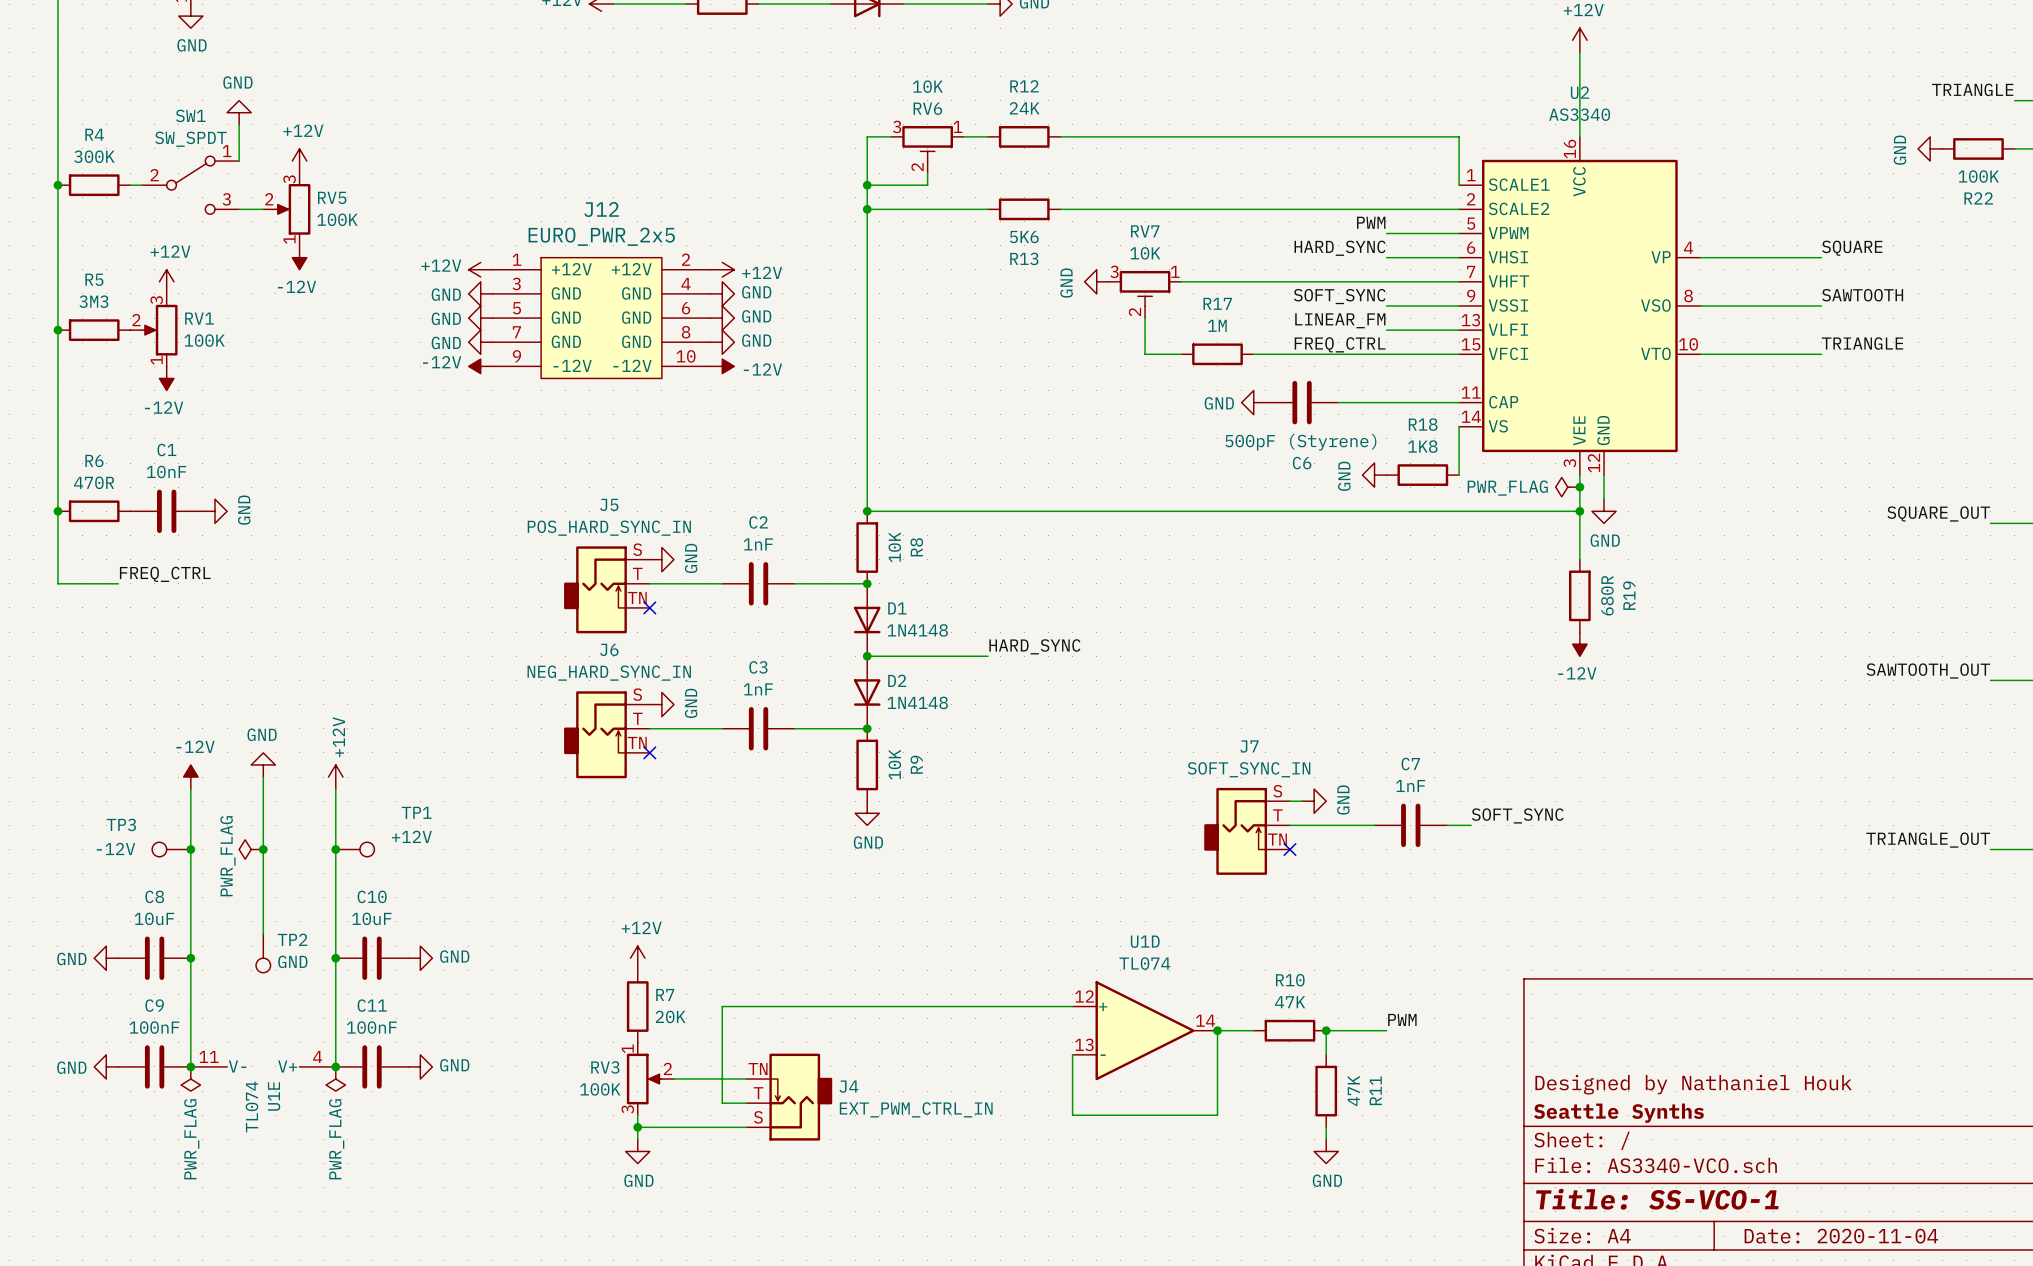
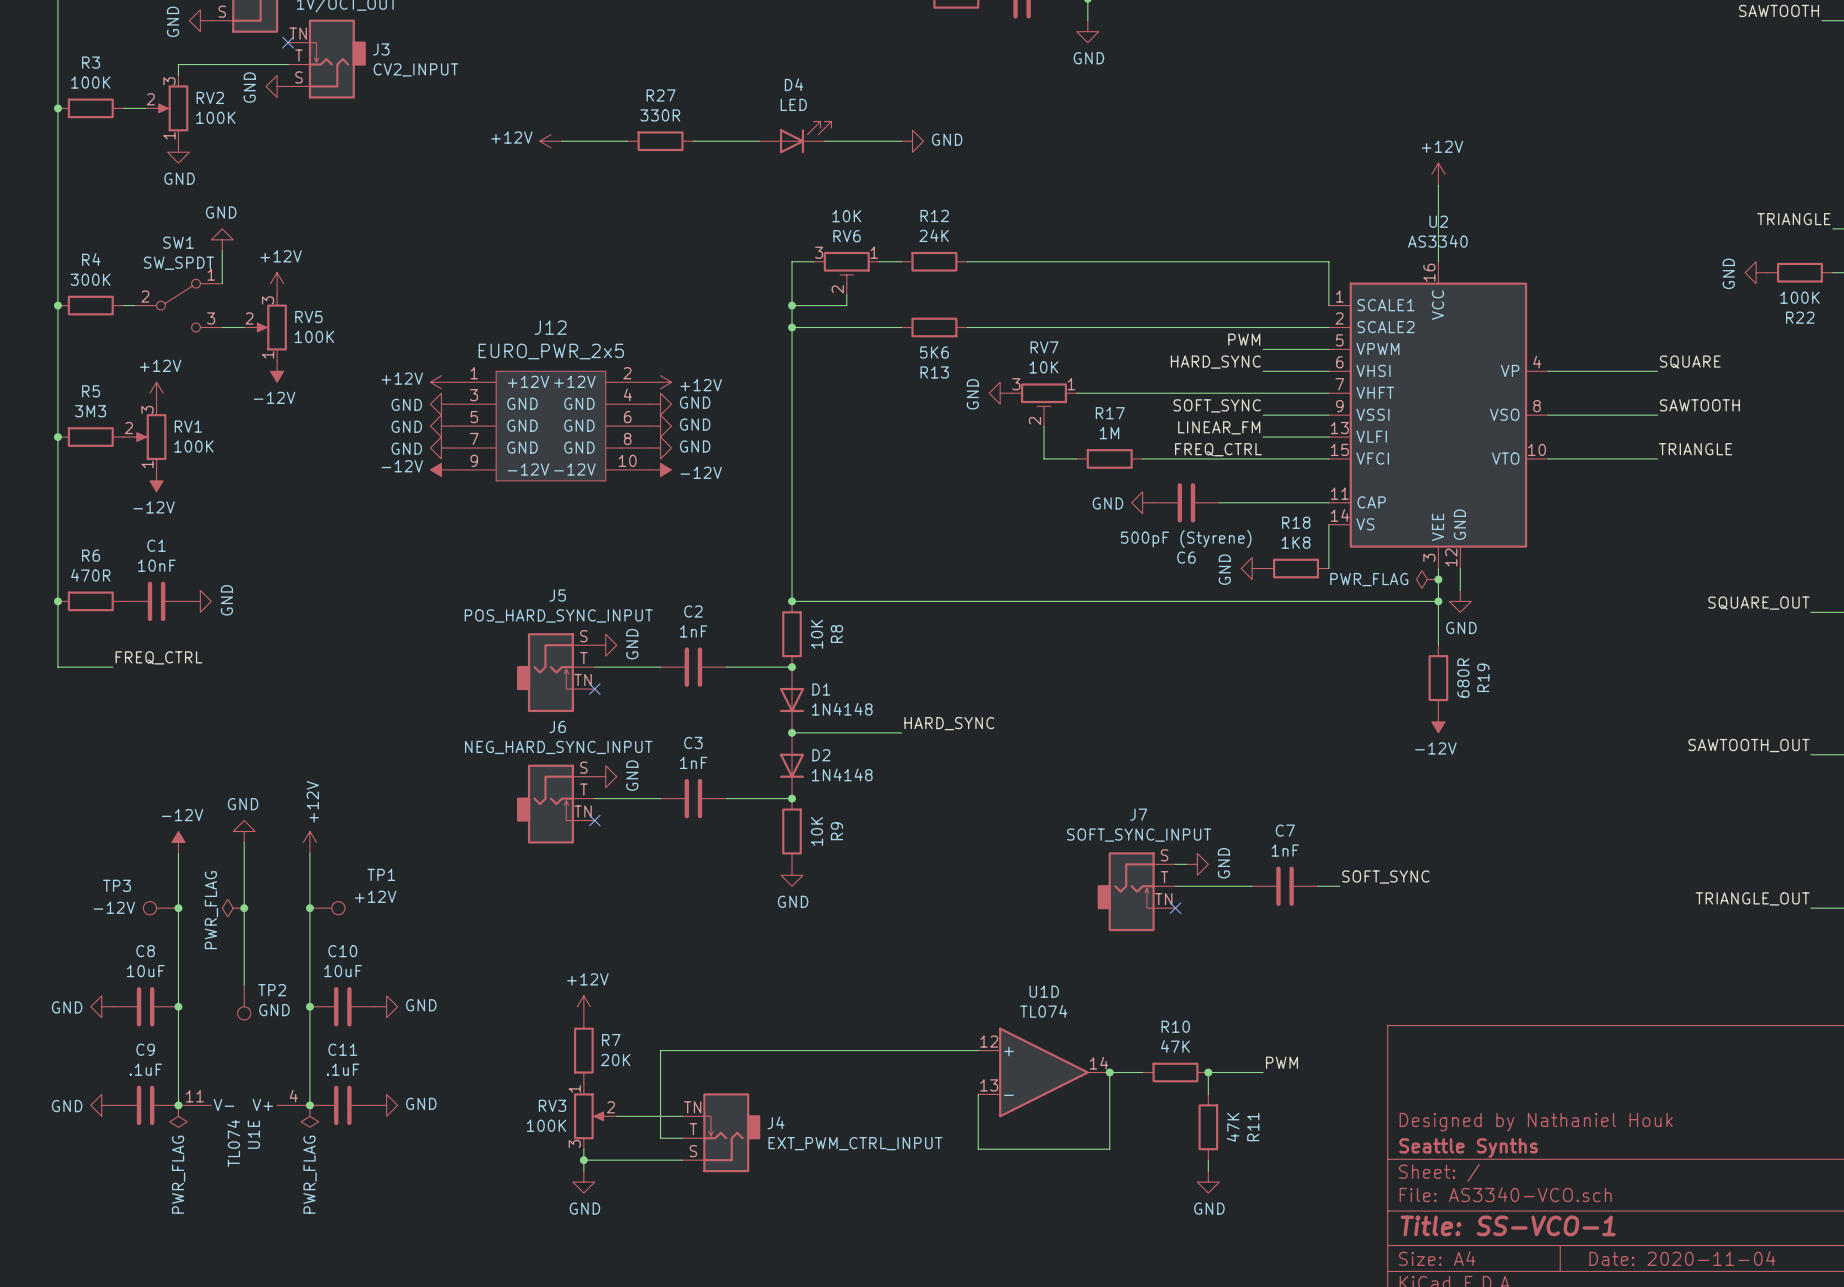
J5 value: POS_HARD_SYNC_IN (609, 528) -> POS_HARD_SYNC_INPUT (558, 615)
J6 value: NEG_HARD_SYNC_IN (609, 673) -> NEG_HARD_SYNC_INPUT (558, 747)
J7 value: SOFT_SYNC_IN (1249, 769) -> SOFT_SYNC_INPUT (1139, 835)
C9 value: 100nF (154, 1027) -> .1uF (145, 1069)
C11 value: 100nF (371, 1027) -> .1uF (343, 1069)
J4 value: EXT_PWM_CTRL_IN (916, 1109) -> EXT_PWM_CTRL_INPUT (855, 1143)

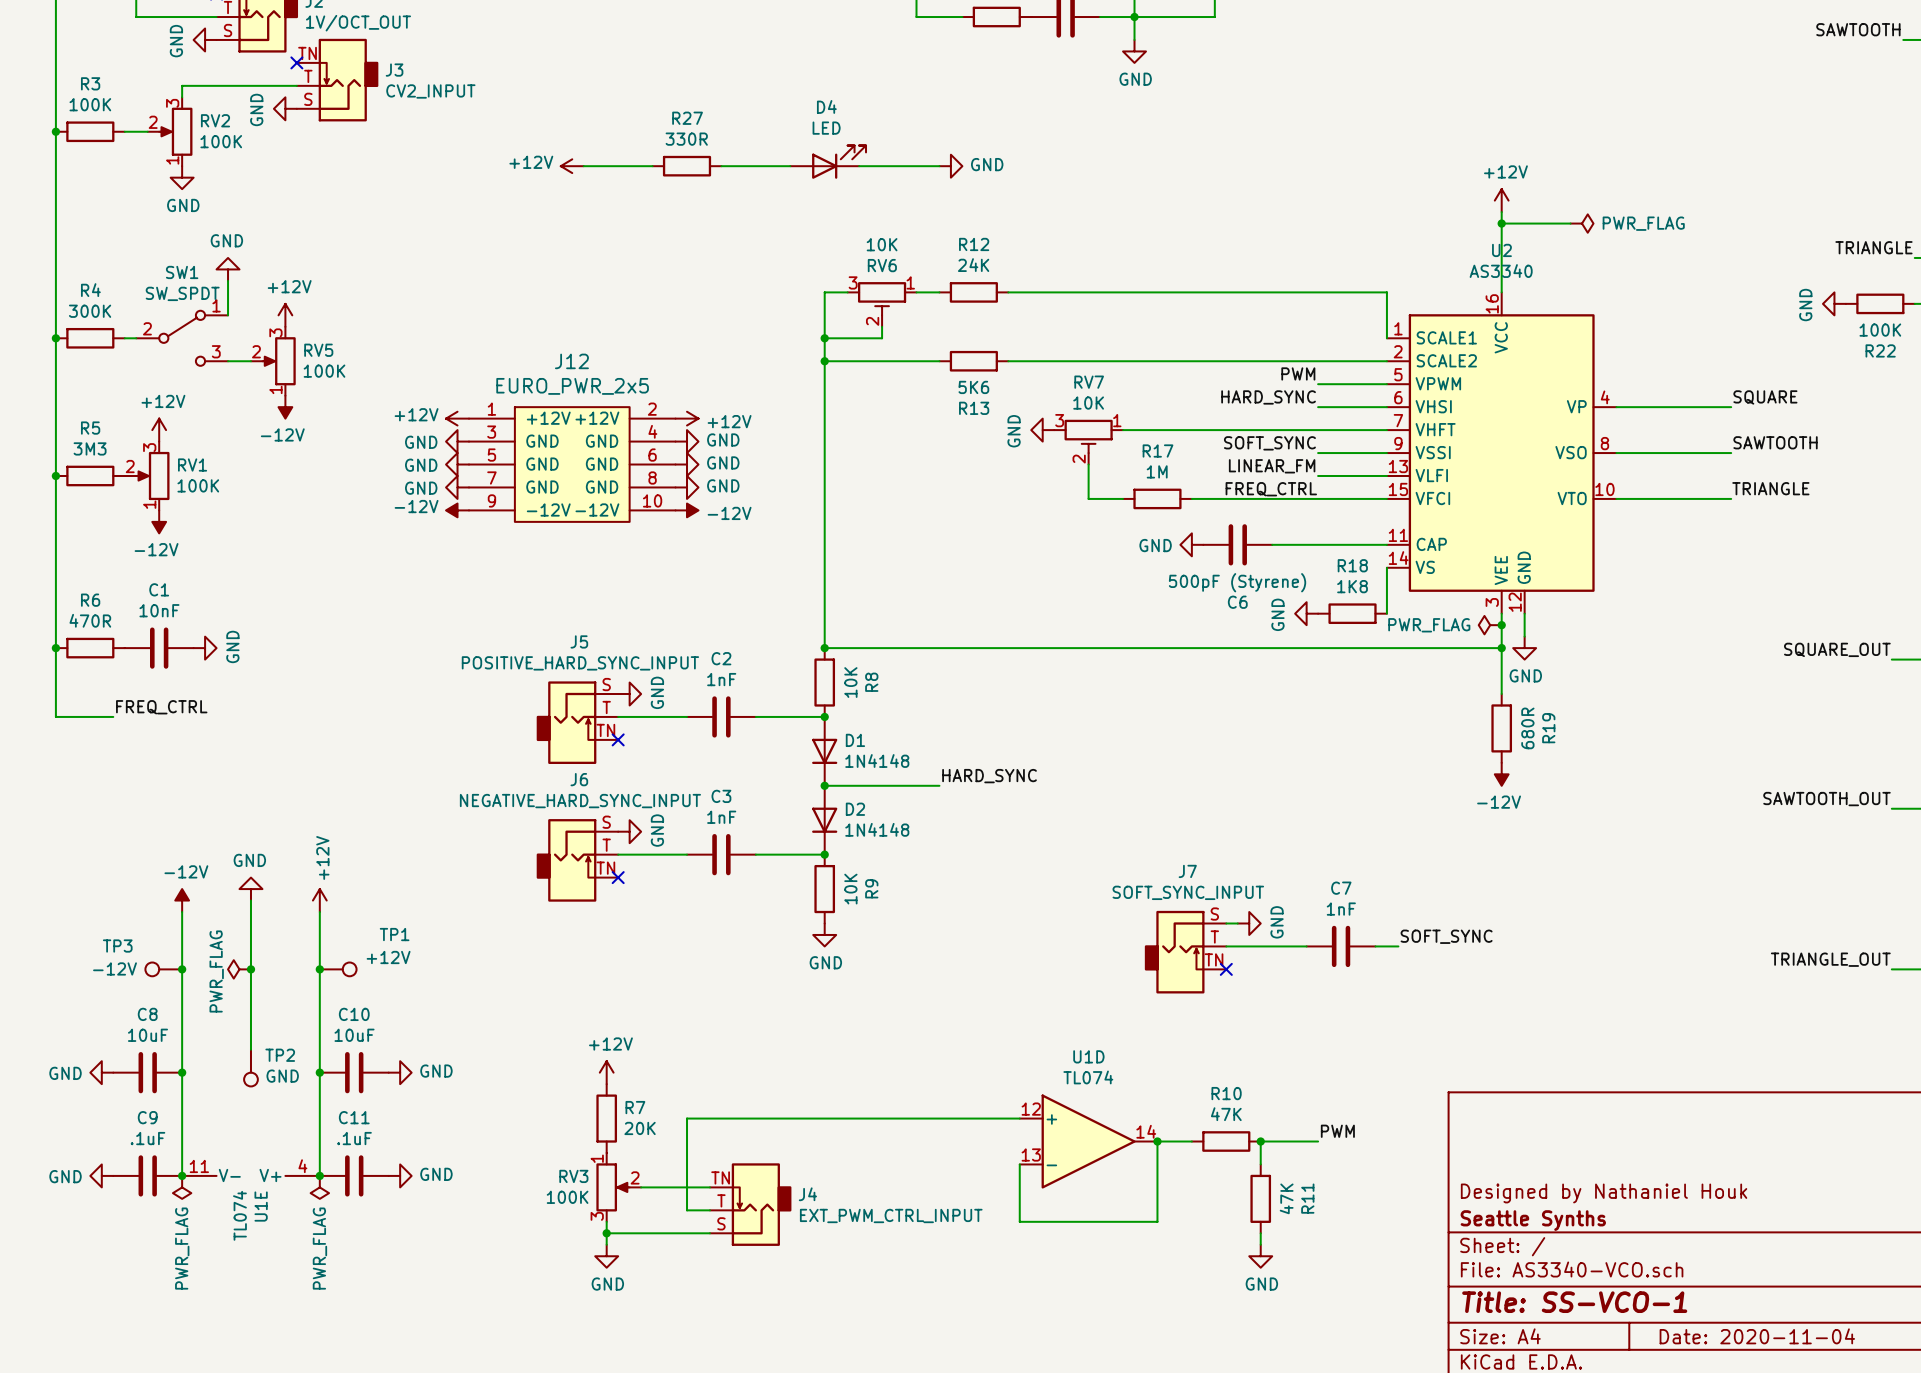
wire: none -> (1501, 223) (1570, 223)
junction: none -> (1501, 223)
power symbol: none -> PWR_FLAG (1582, 223)
J5 value: POS_HARD_SYNC_INPUT (558, 615) -> POSITIVE_HARD_SYNC_INPUT (580, 663)
J6 value: NEG_HARD_SYNC_INPUT (558, 747) -> NEGATIVE_HARD_SYNC_INPUT (580, 801)

